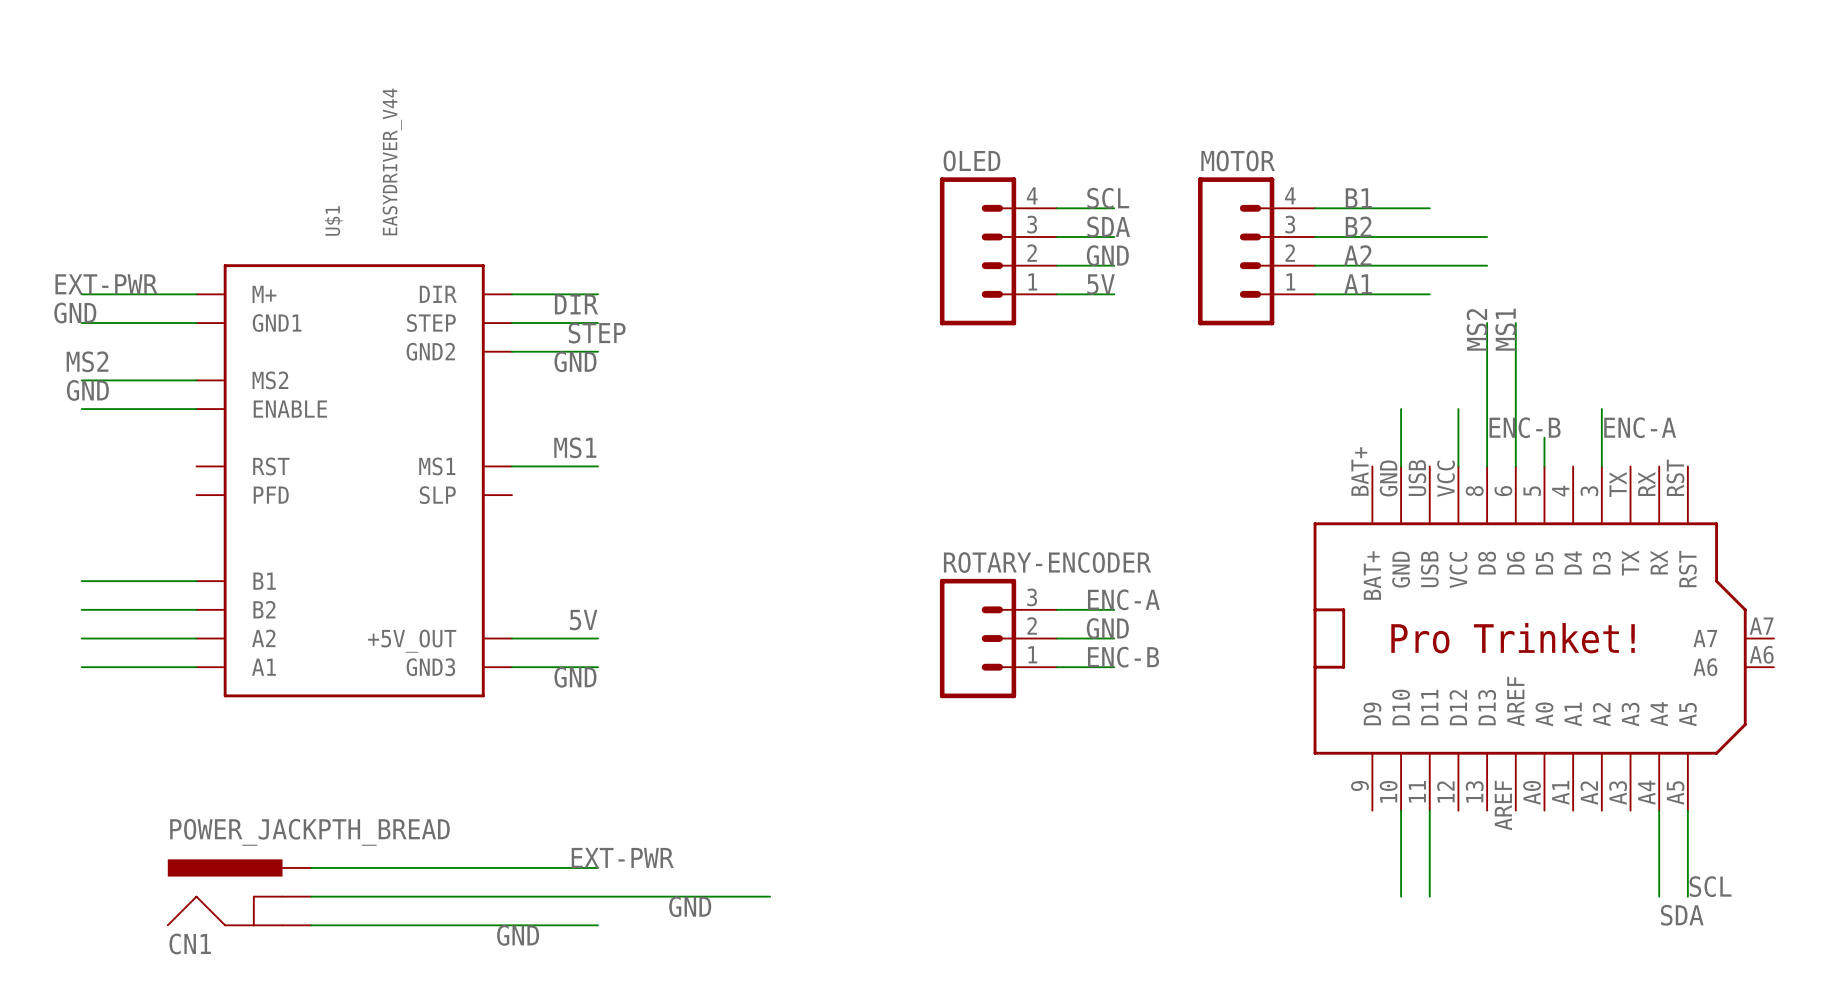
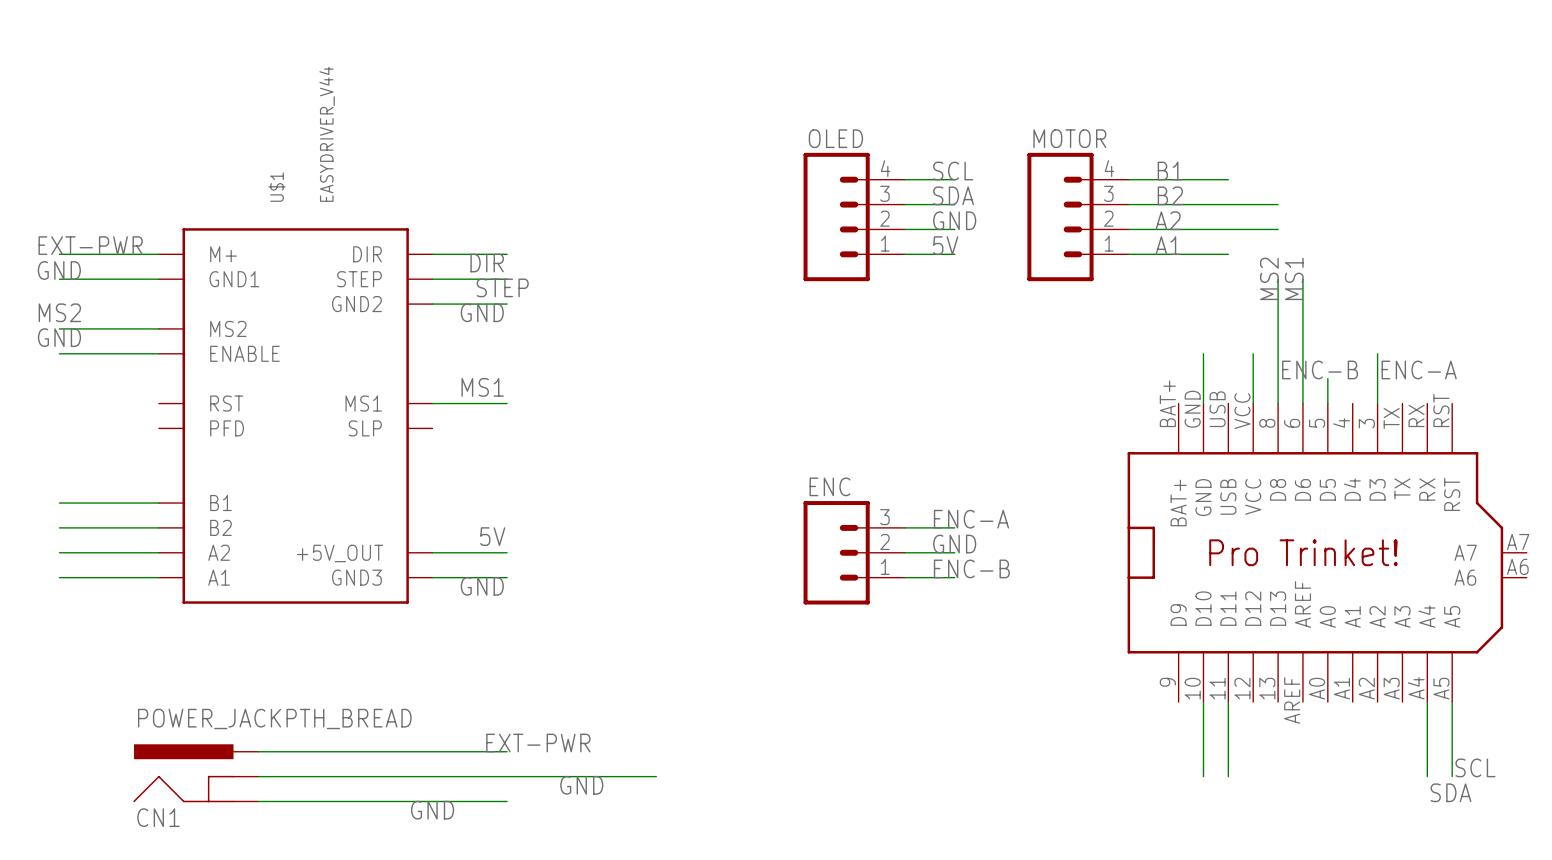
ROTARY-ENCODER name: ROTARY-ENCODER (1047, 562) -> ENC (829, 486)

